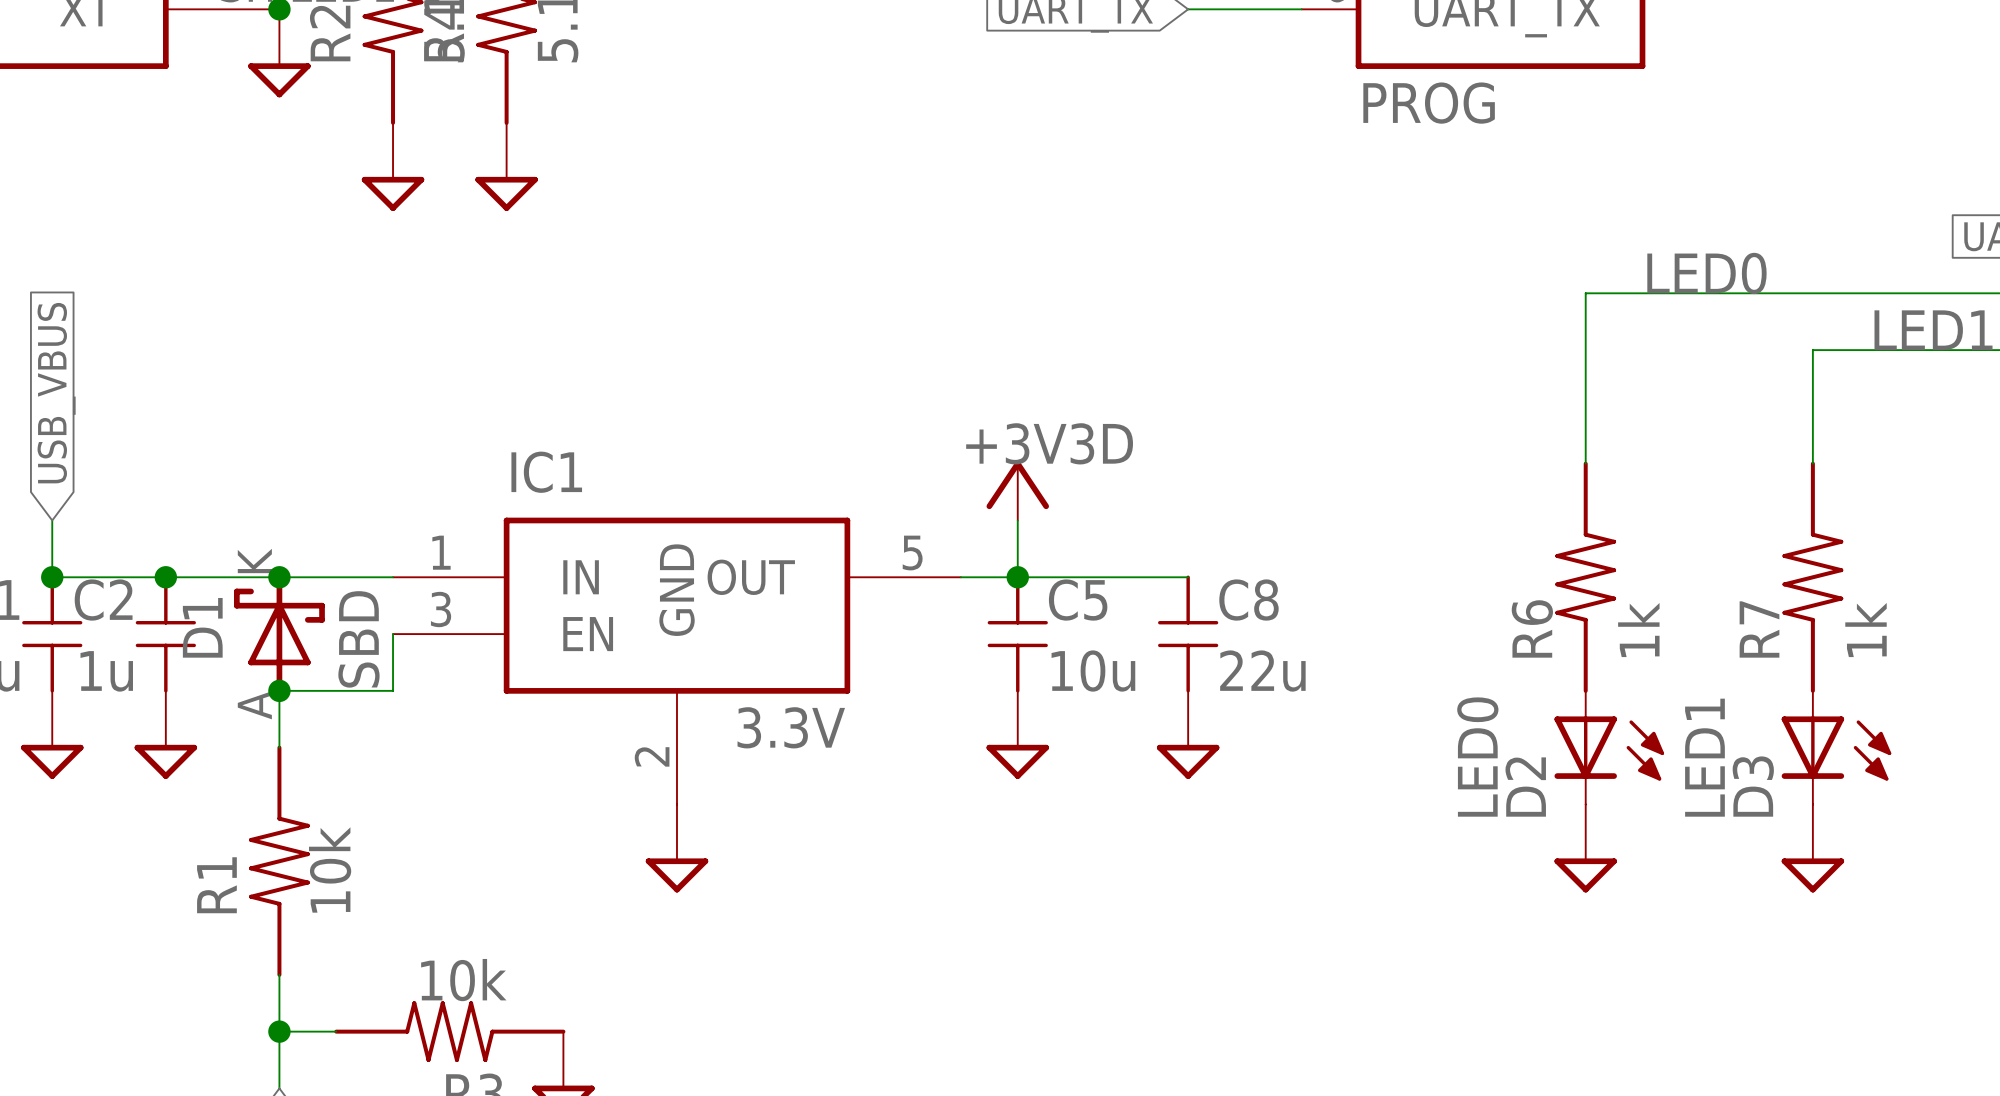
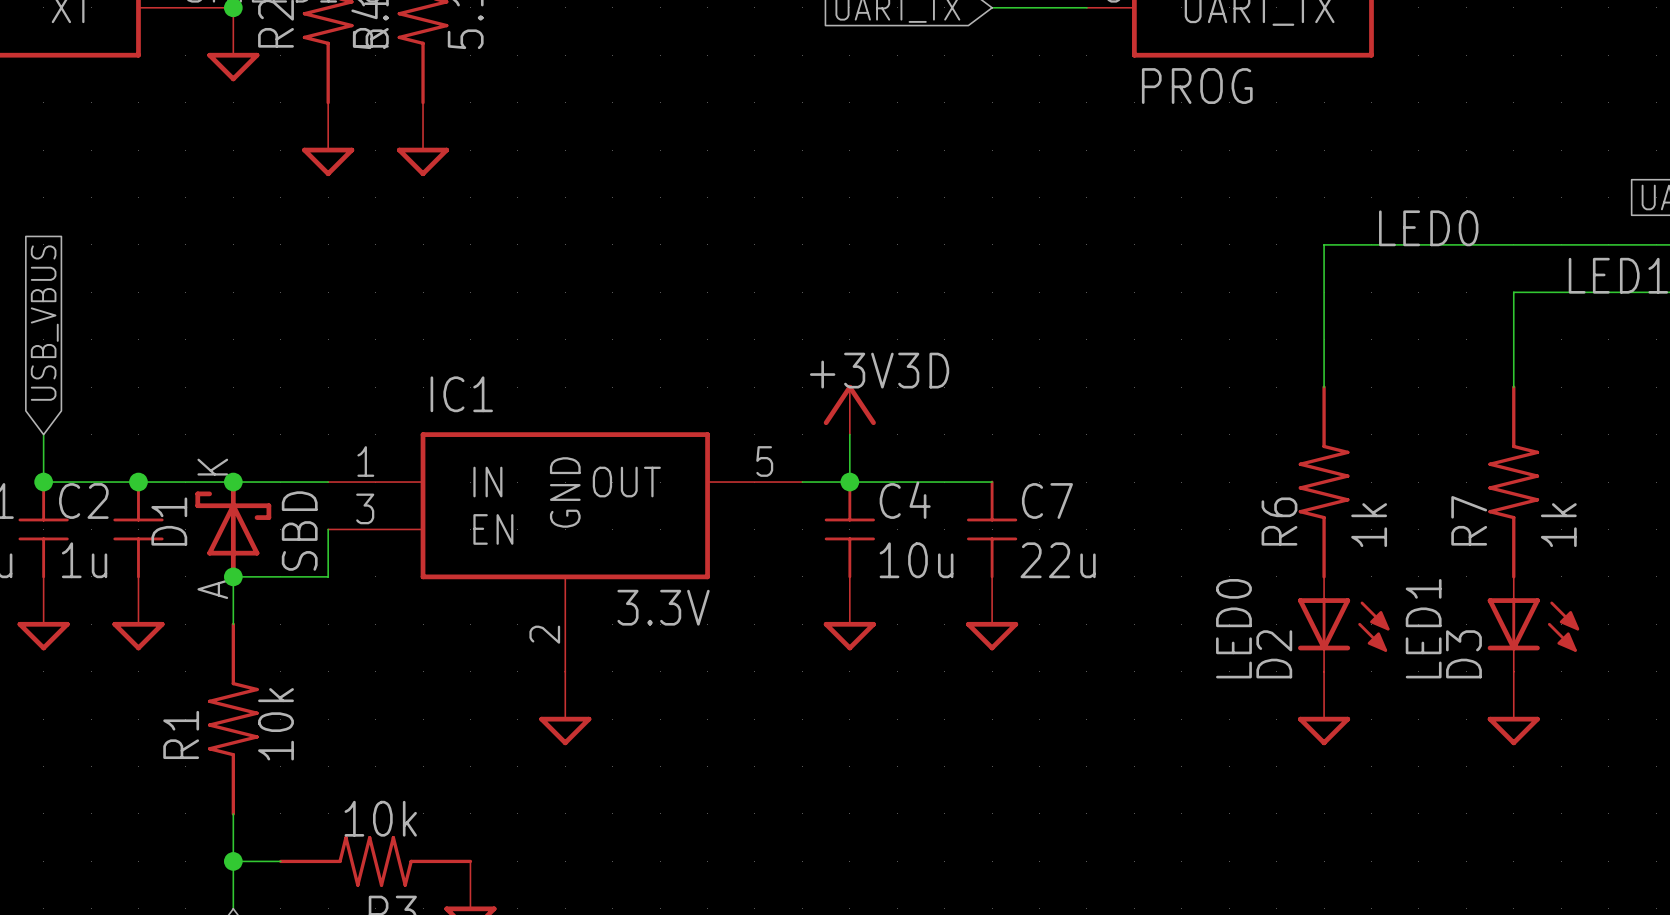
C5 name: C5 (1078, 600) -> C4 (905, 500)
C8 name: C8 (1248, 600) -> C7 (1047, 501)

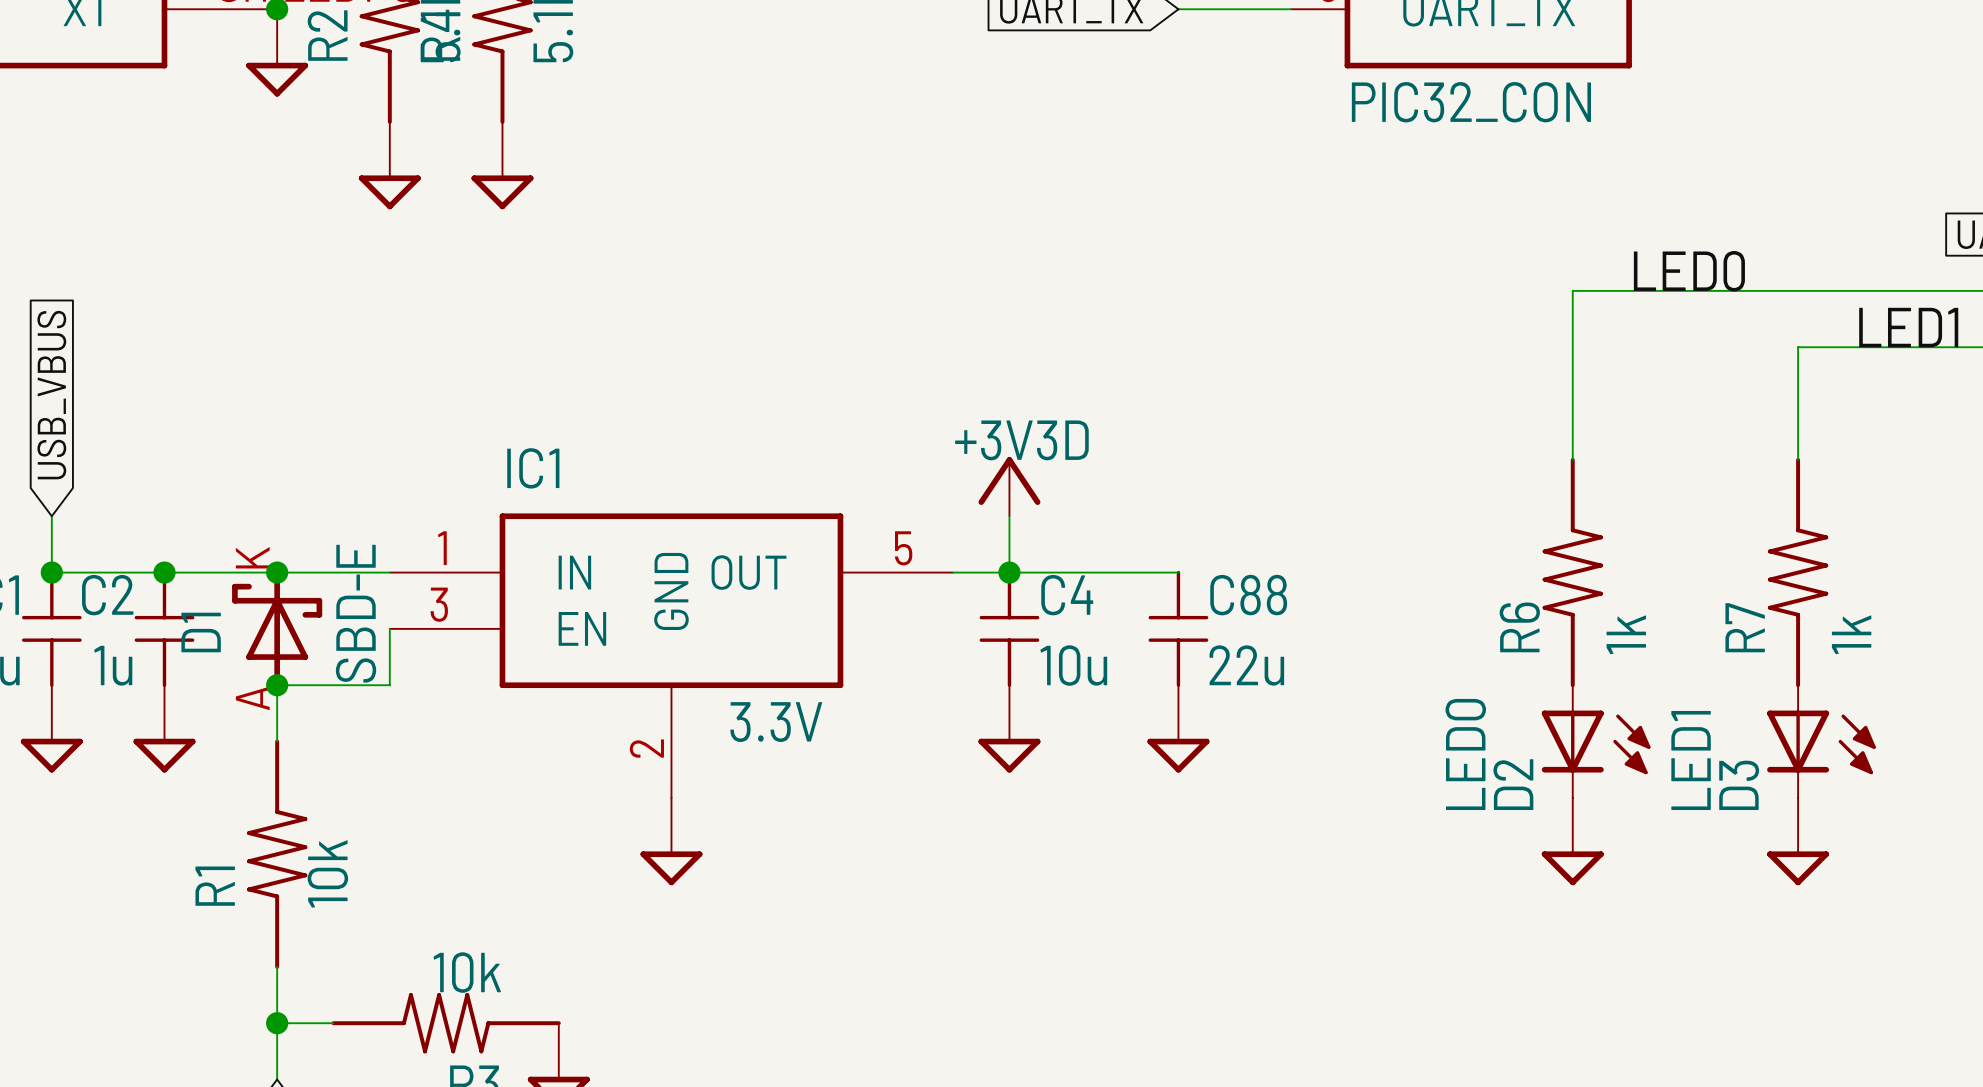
part value: PROG (1197, 86) -> PIC32_CON (1471, 102)
C7 name: C7 (1047, 501) -> C88 (1248, 595)
D1 value: SBD (299, 531) -> SBD-E (356, 613)

